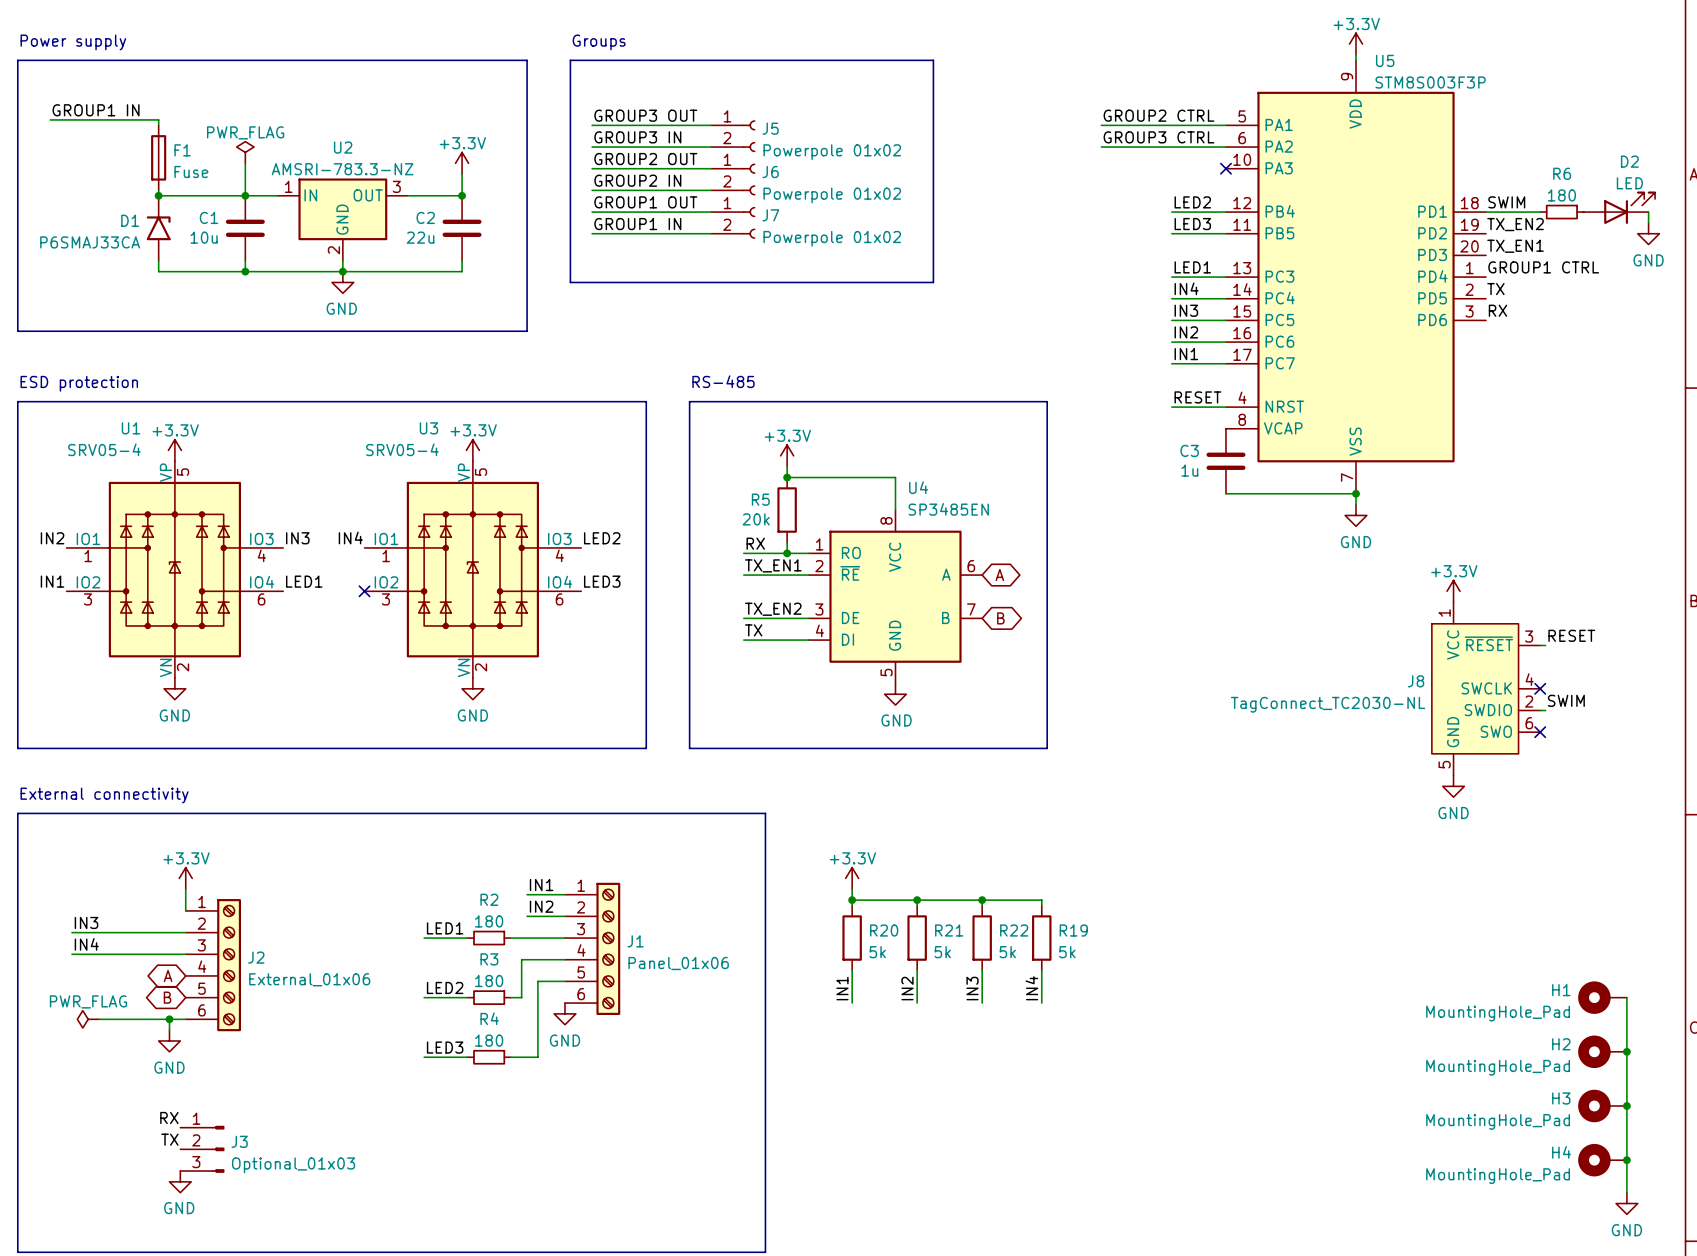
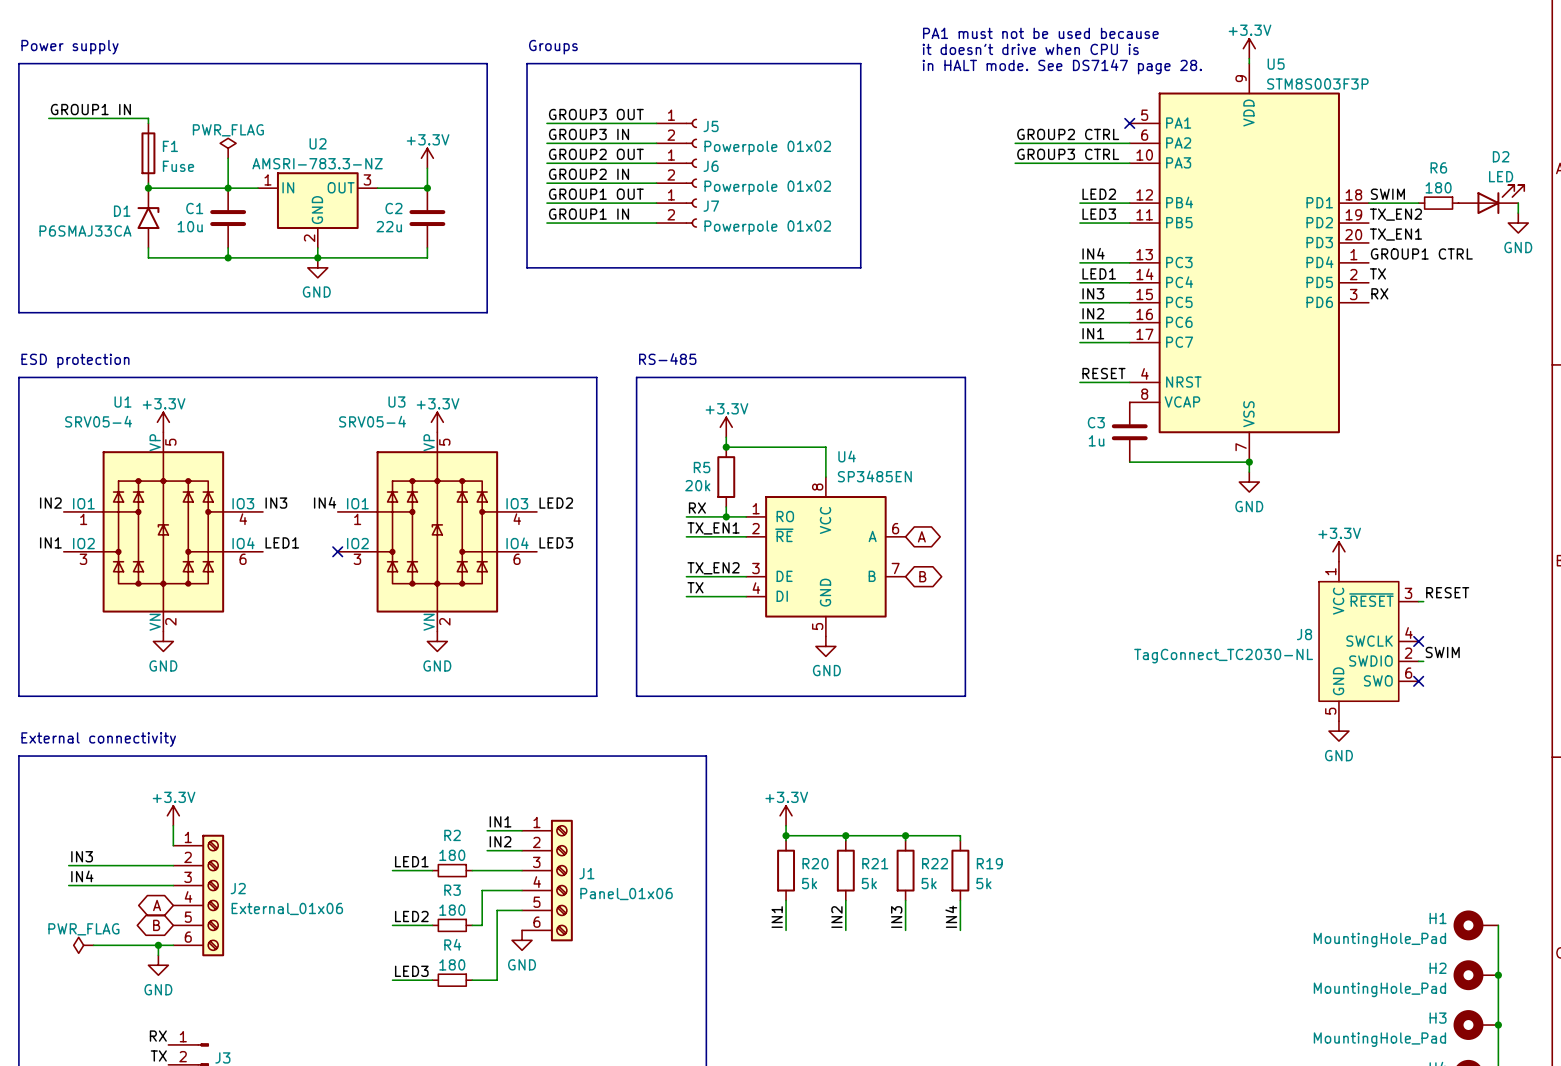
text: none -> PA1 must not be used because (1040, 33)
text: none -> it doesn't drive when CPU is (1030, 49)
text: none -> in HALT mode. See DS7147 page 28. (1062, 66)
label: GROUP2 CTRL (1158, 115) -> none
wire: (1101, 125) (1225, 125) -> (1015, 163) (1129, 163)
label: GROUP3 CTRL (1158, 137) -> GROUP2 CTRL (1068, 134)
label: none -> GROUP3 CTRL (1068, 154)
no-connect mark position: (1225, 168) -> (1129, 123)
label: LED1 (1192, 267) -> IN4 (1093, 253)
label: IN4 (1186, 288) -> LED1 (1099, 273)

